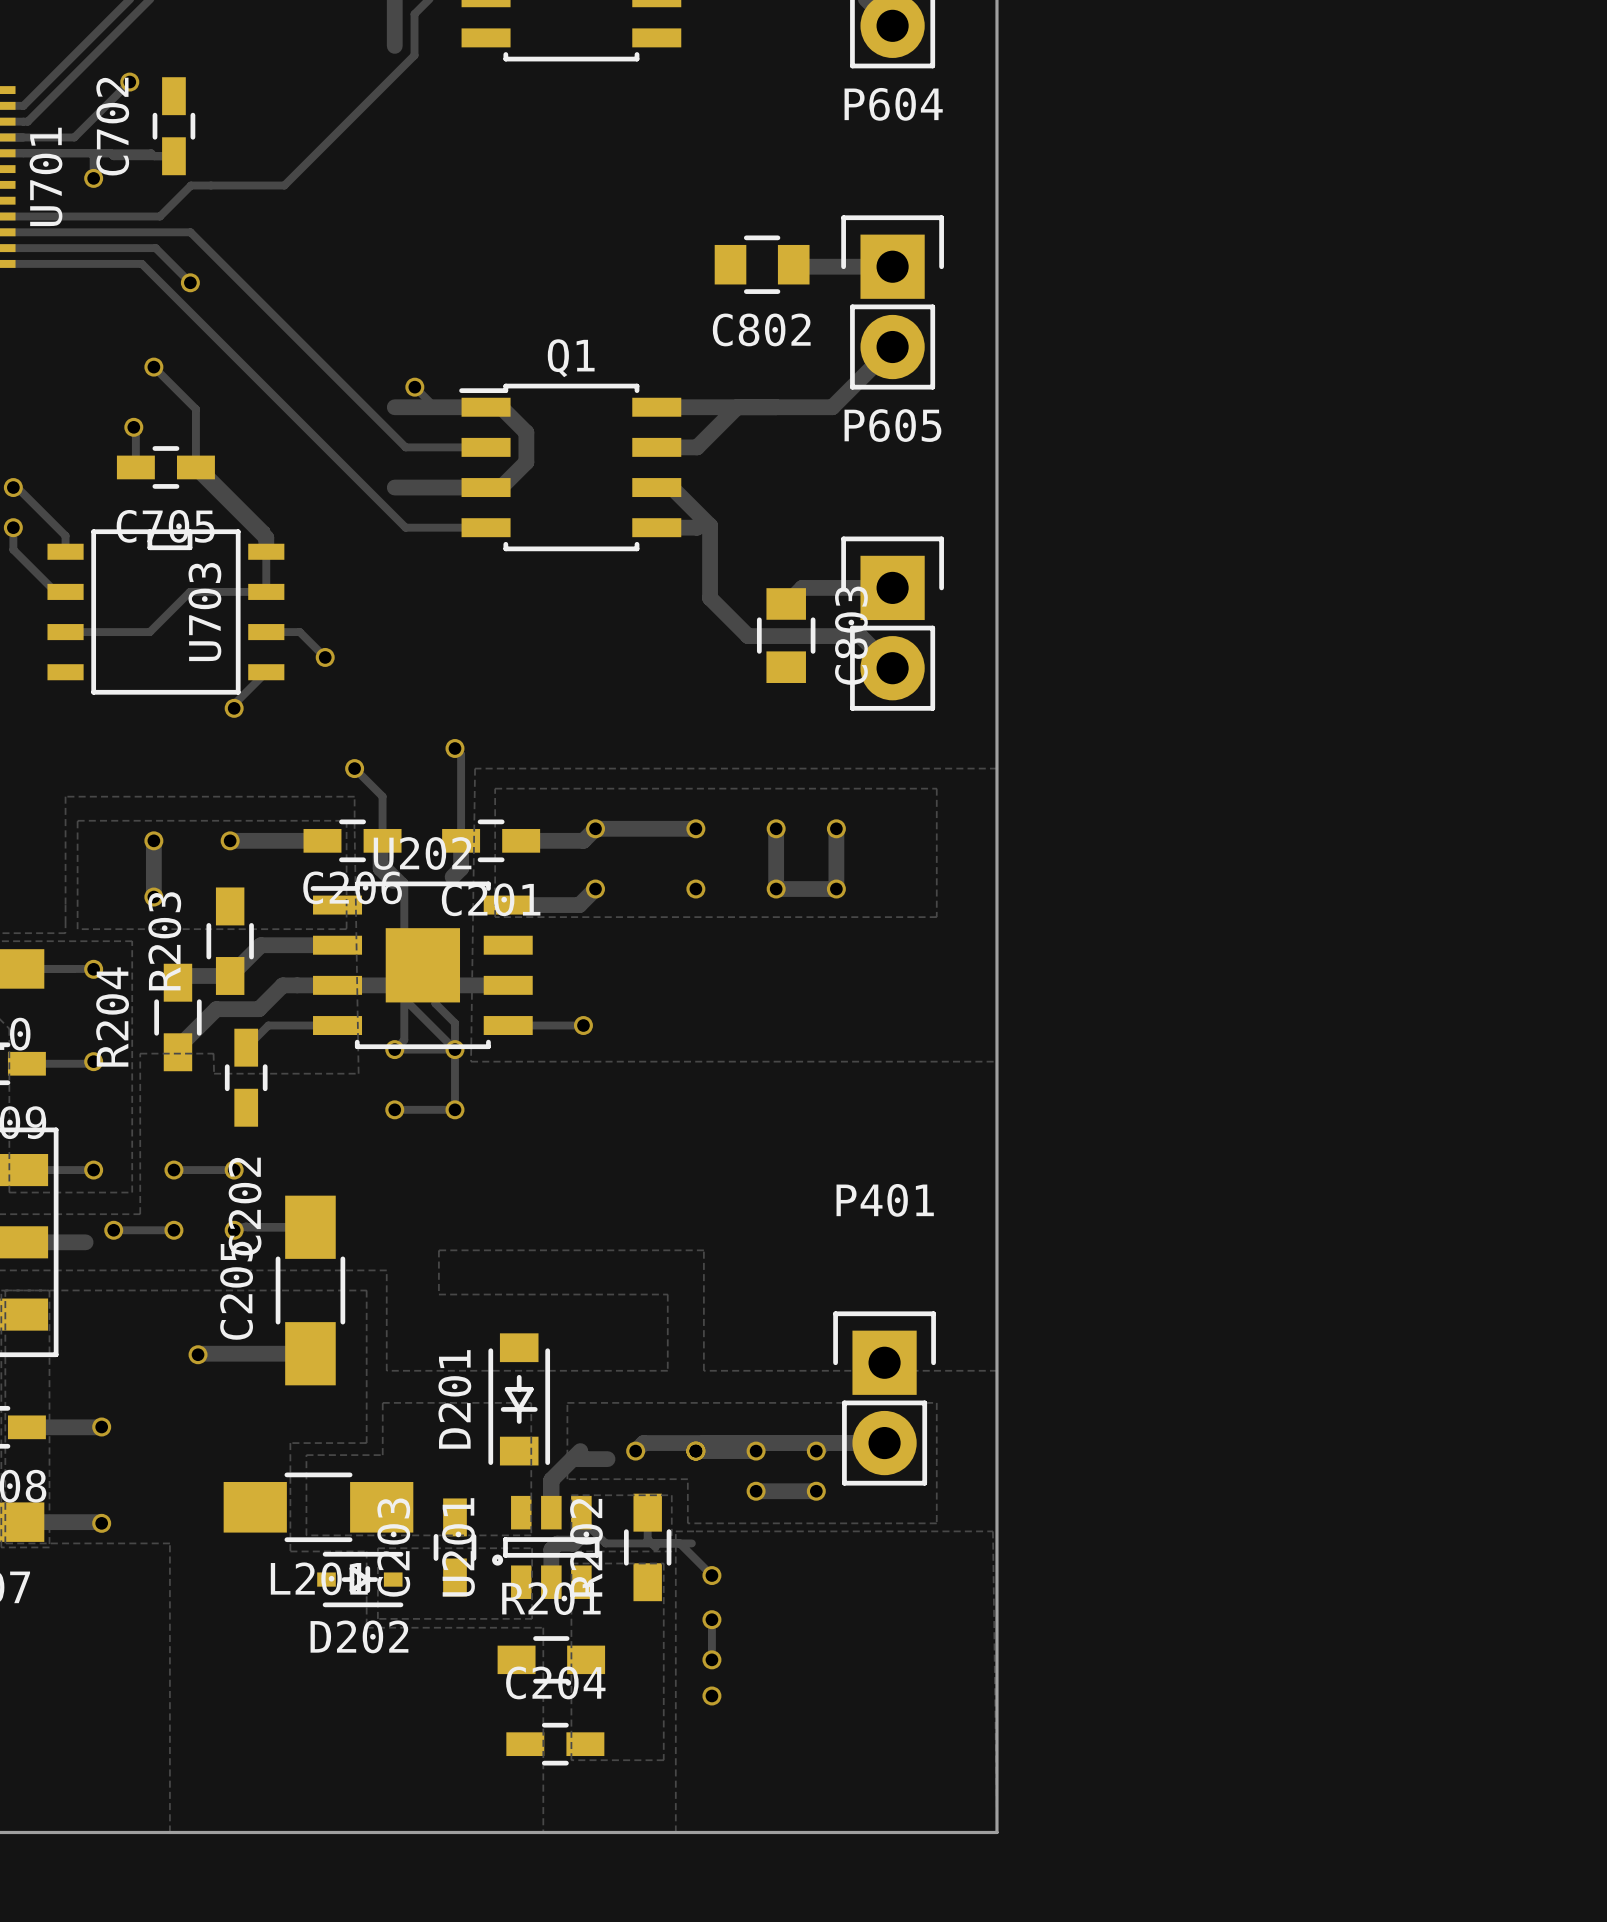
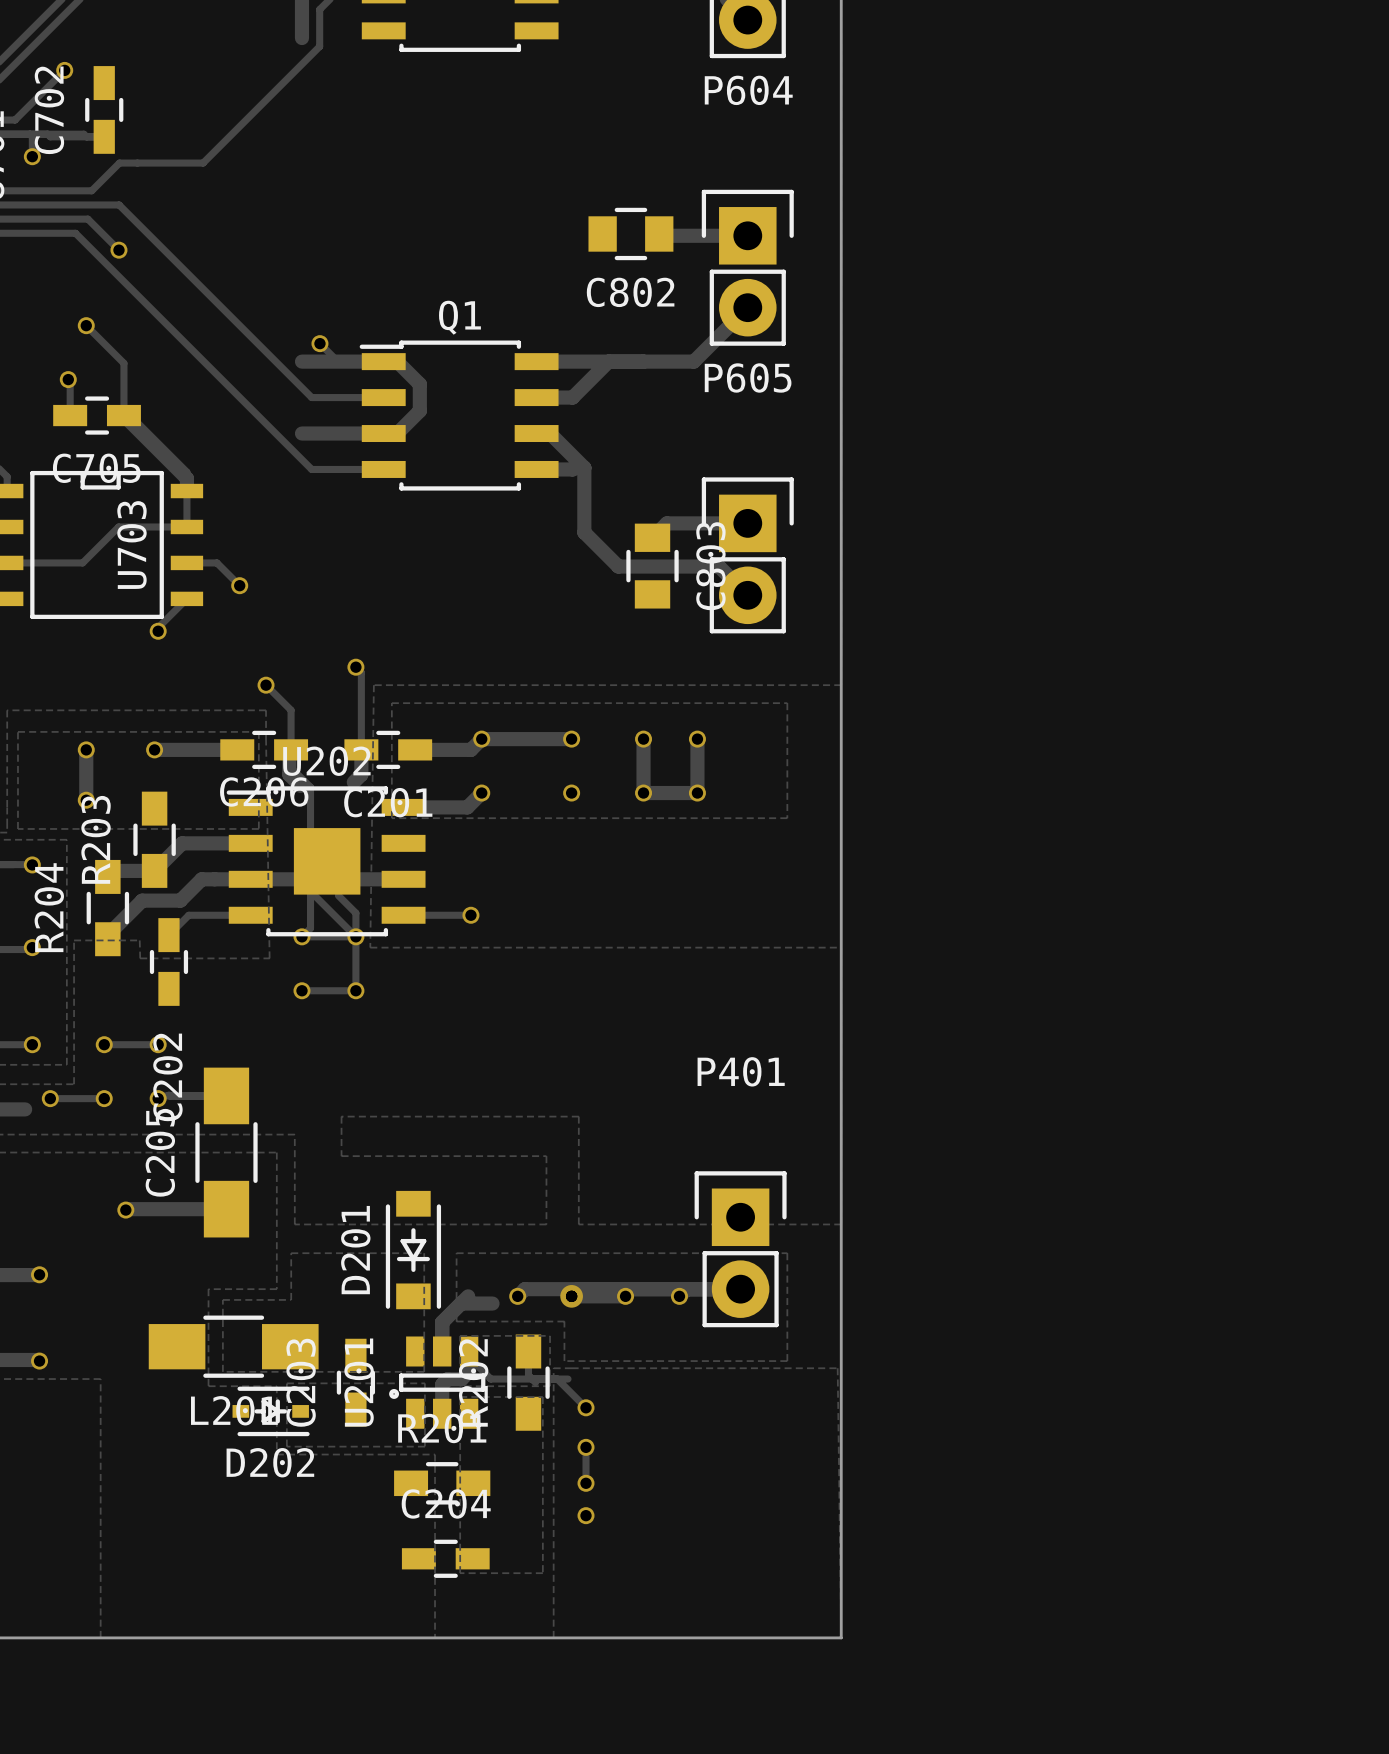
via: none -> (571, 1296)
track: (756, 1491) (816, 1491) -> none
via: (756, 1491) -> none
via: (816, 1491) -> none

